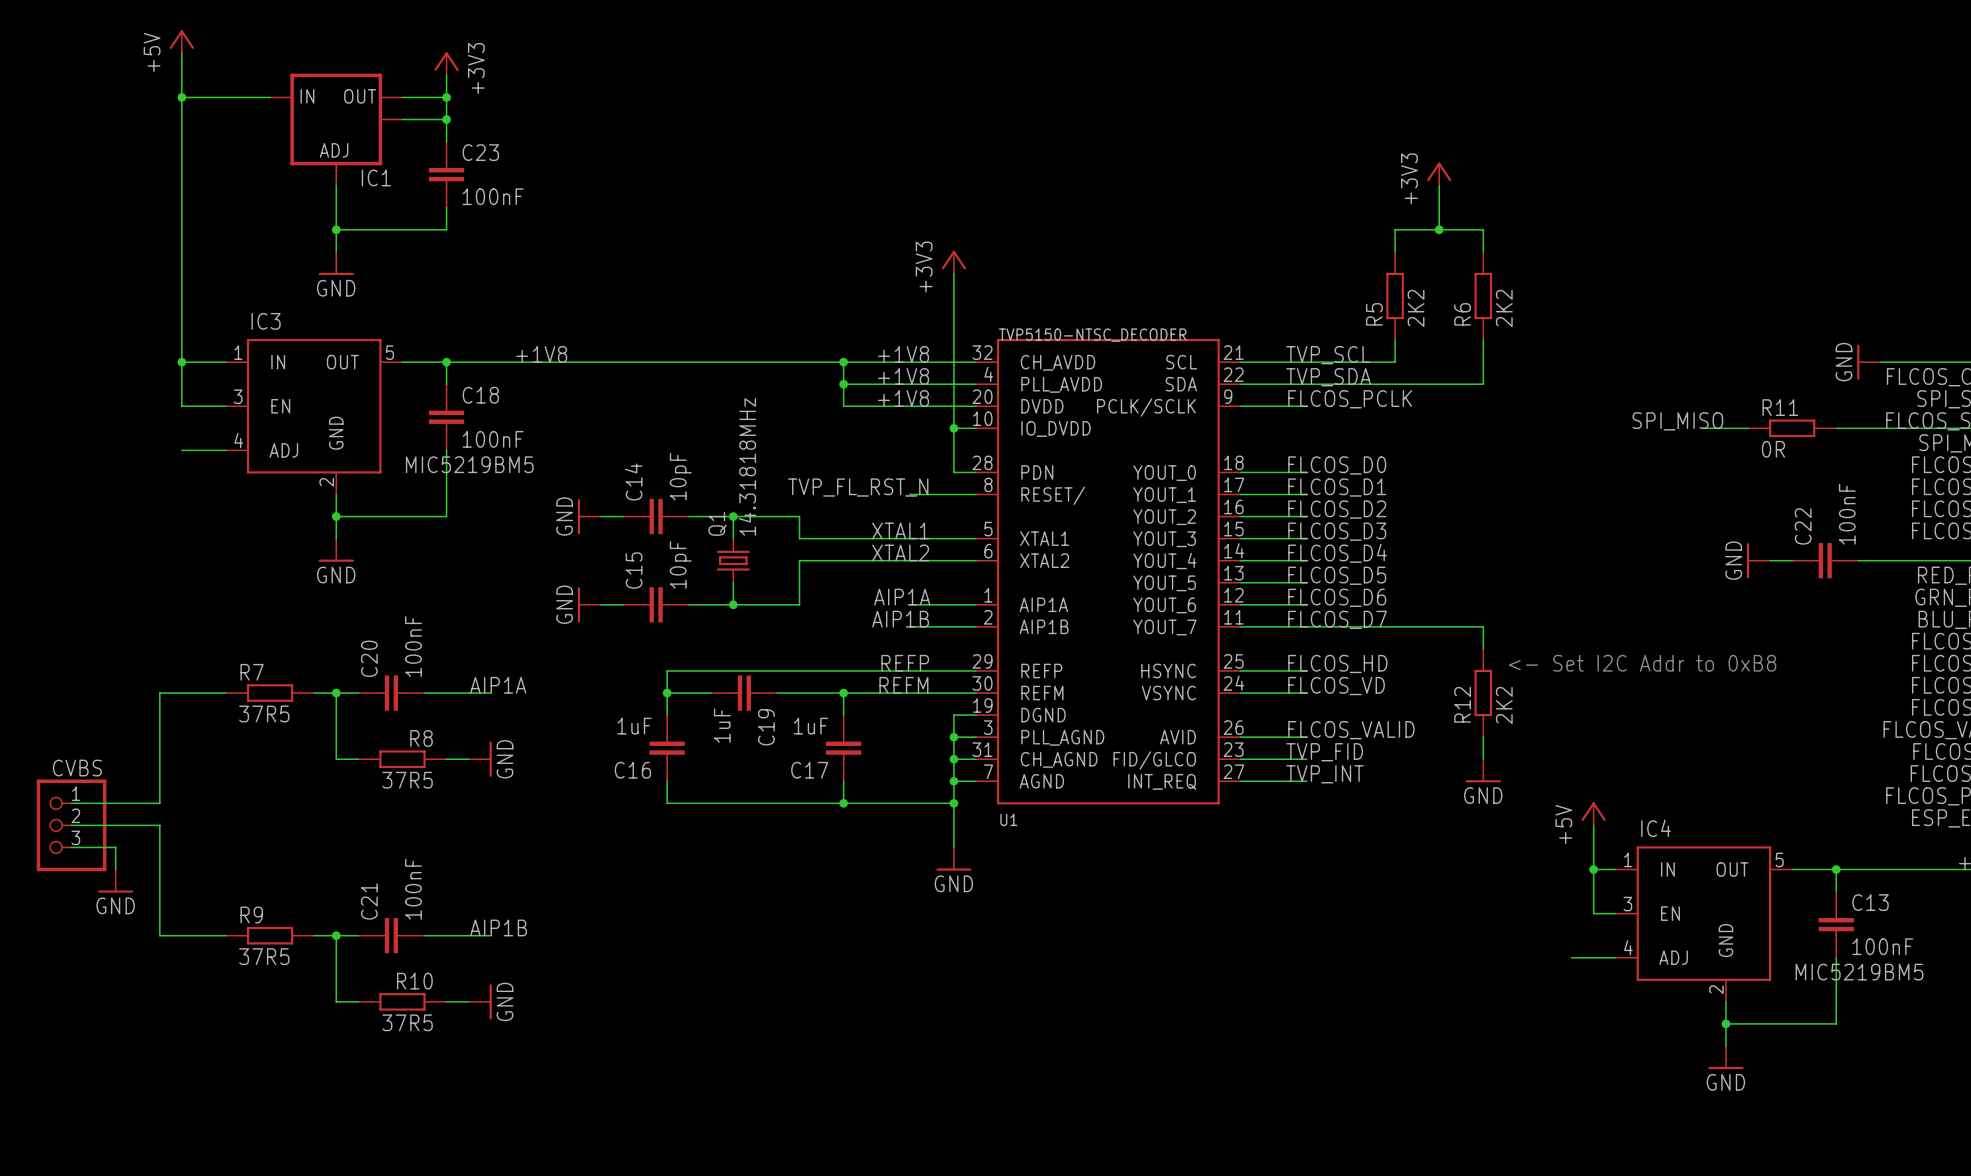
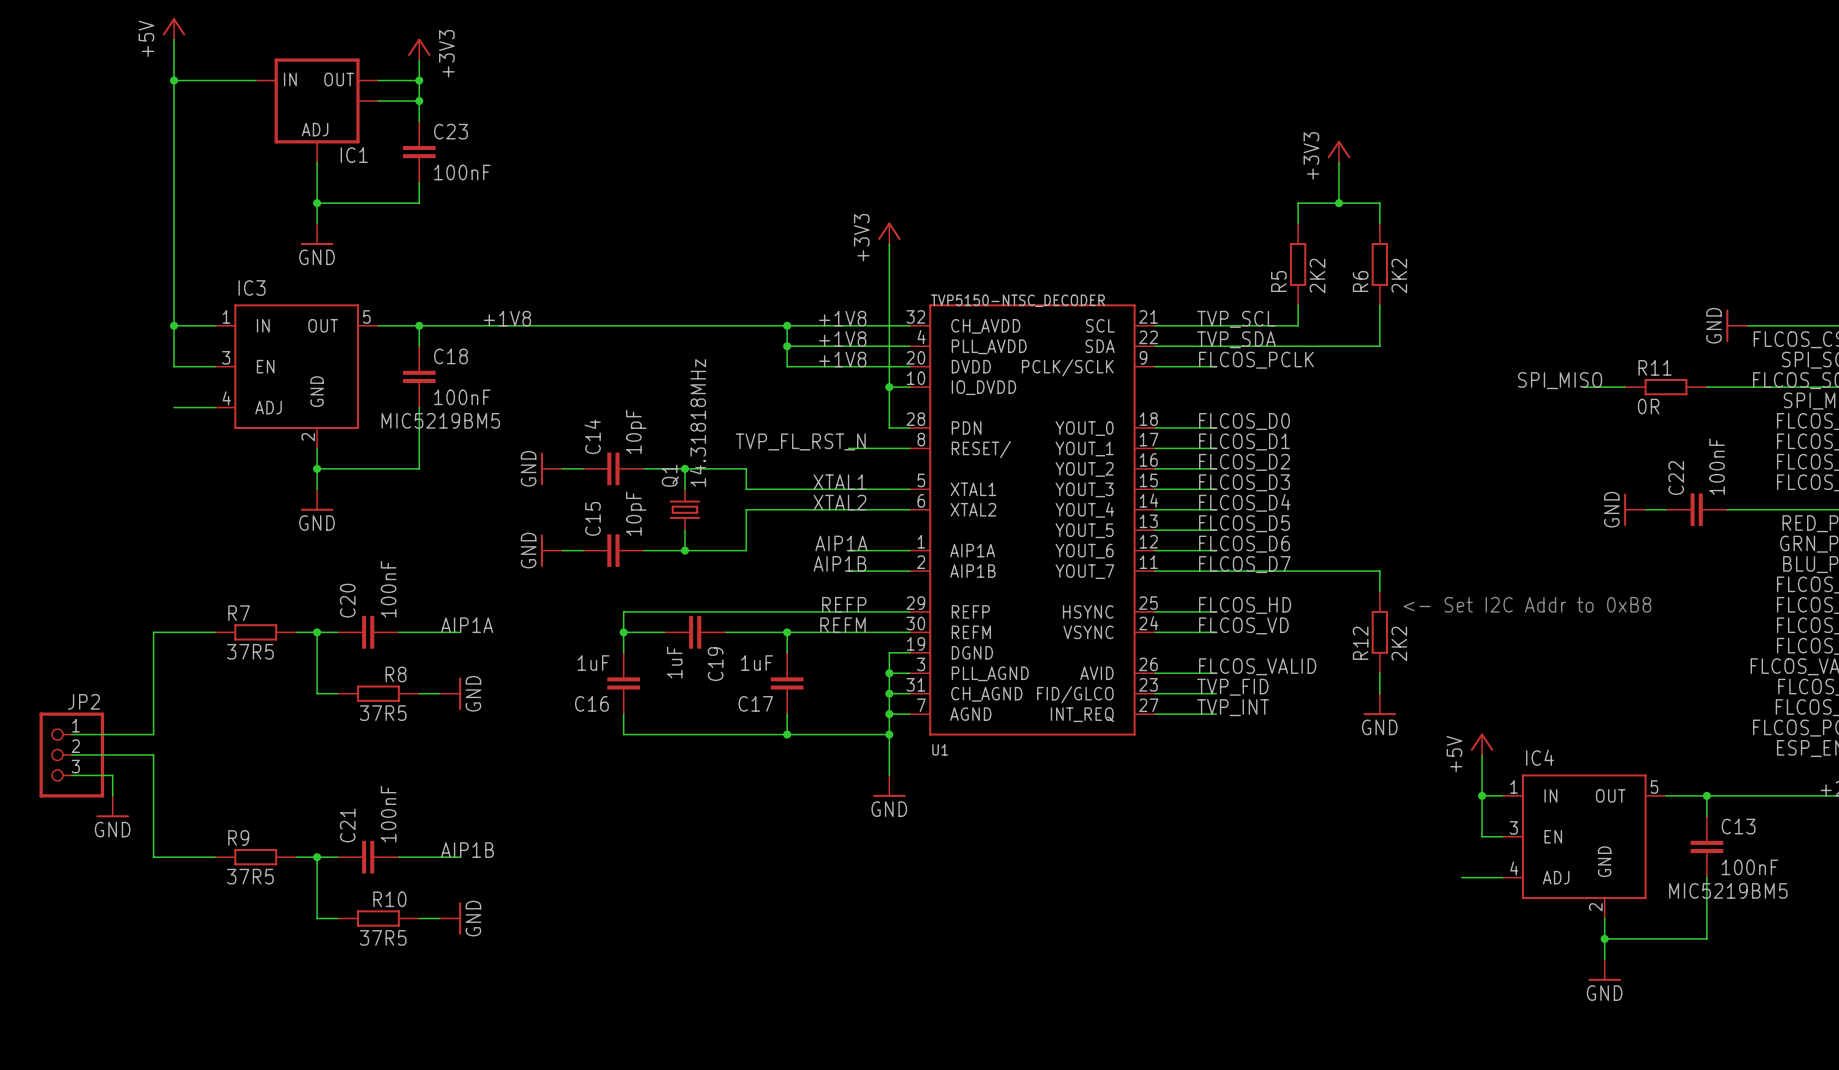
CVBS name: CVBS (77, 768) -> JP2 (83, 701)

